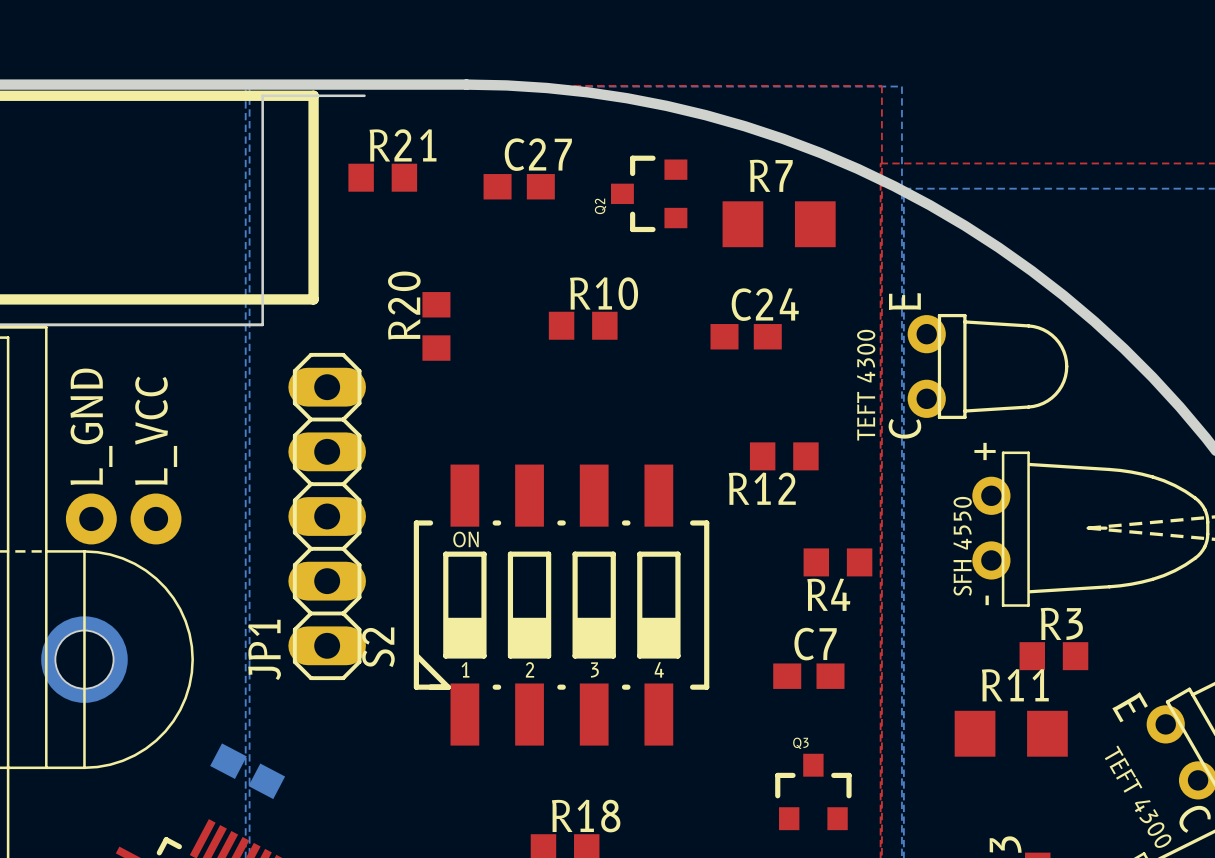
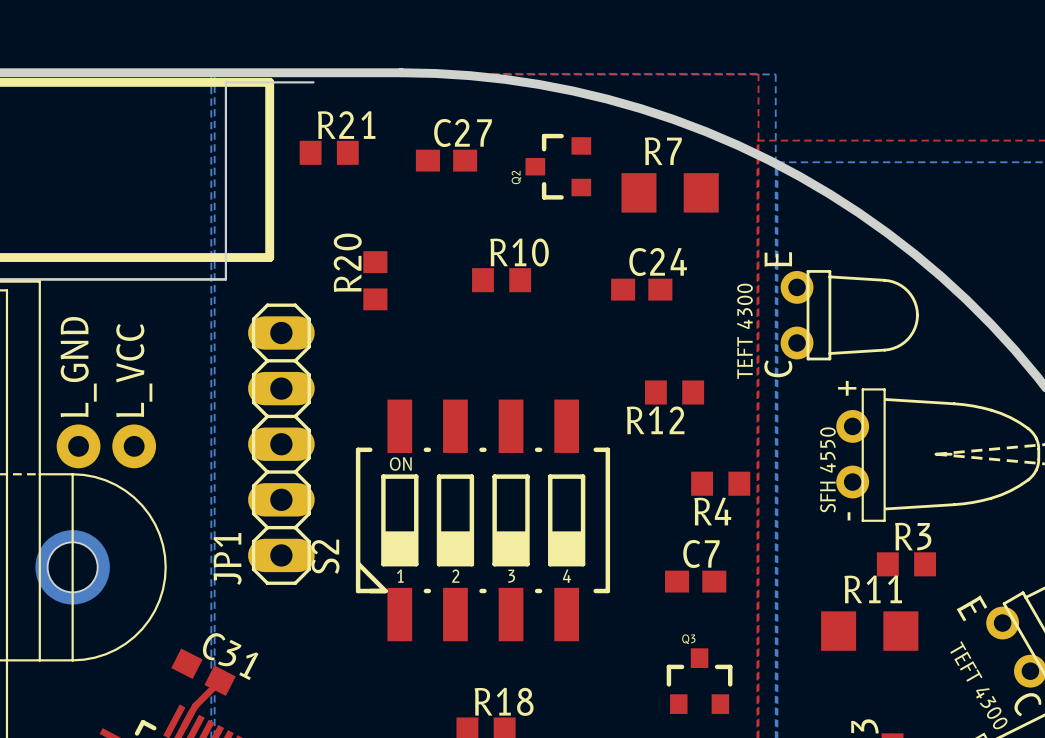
C31 side: bottom (247, 771) -> top (203, 672)
top track: none -> (220, 680) (195, 706) (184, 726)

